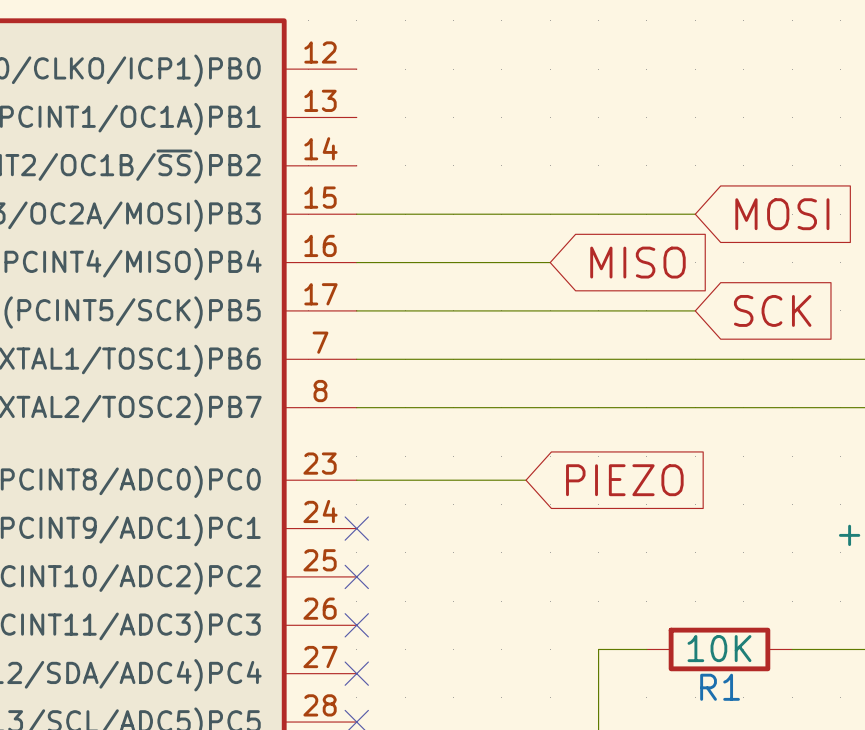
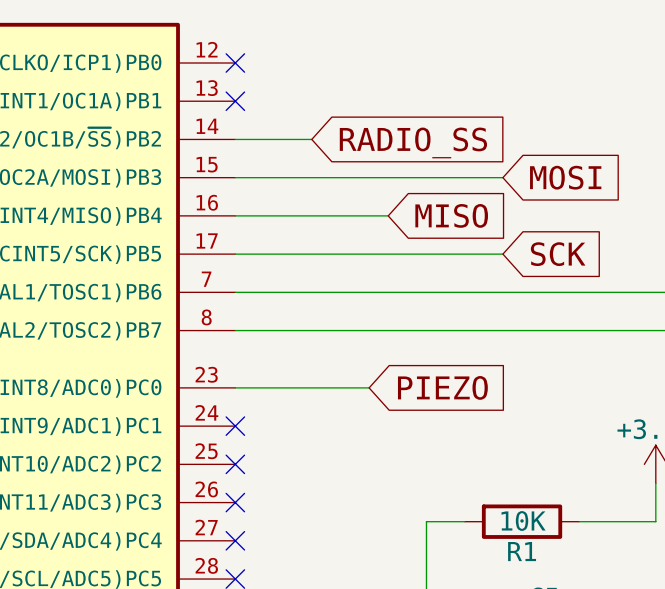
no-connect mark: none -> (235, 63)
no-connect mark: none -> (235, 101)
wire: none -> (235, 139) (311, 139)
global label: none -> RADIO_SS (413, 142)

